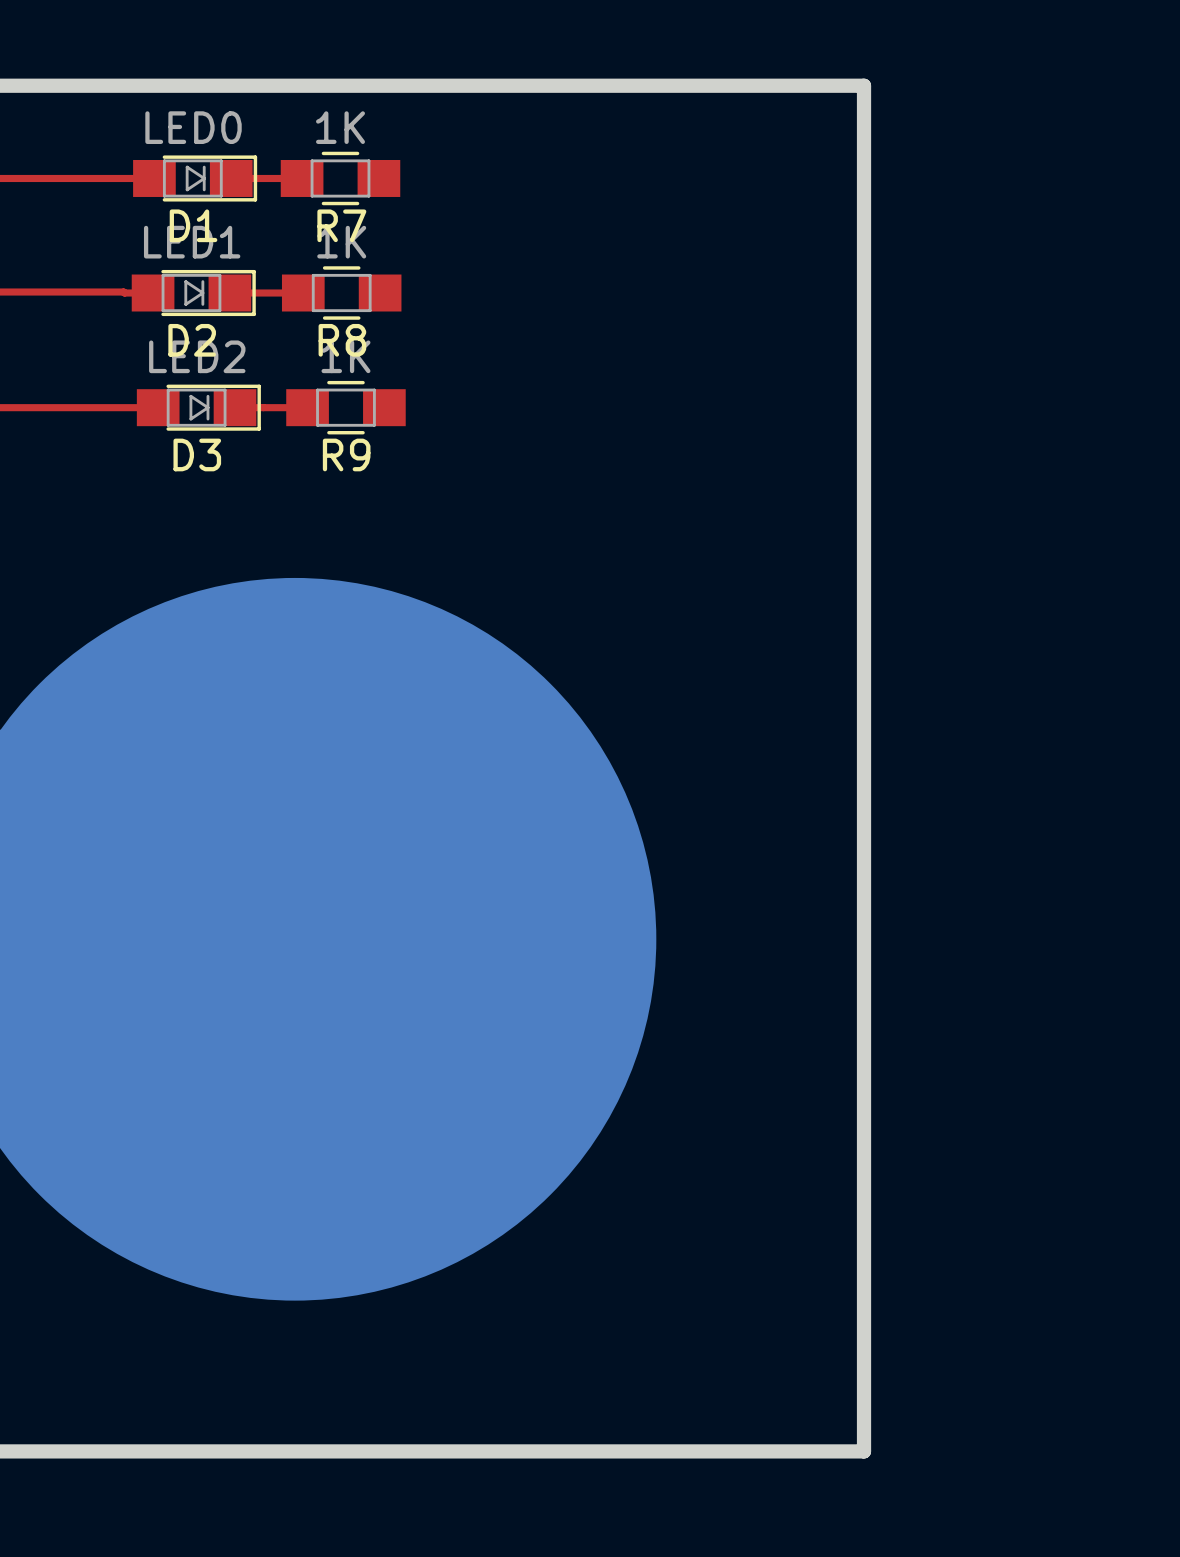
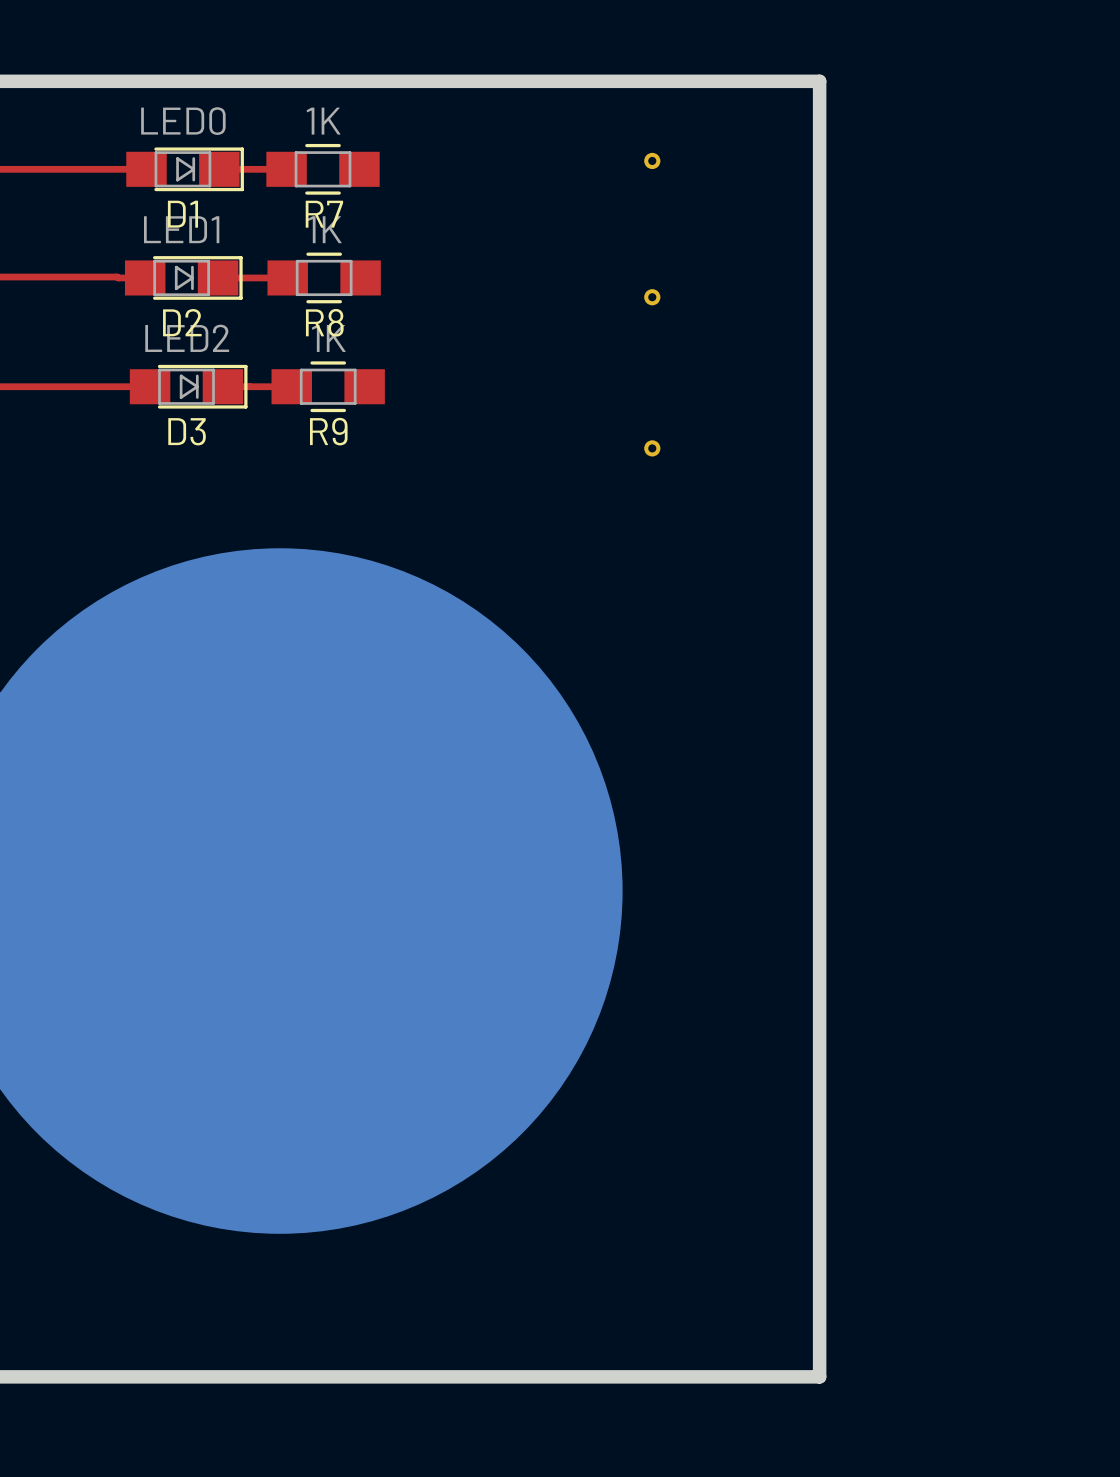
part: none -> (652, 160)
part: none -> (652, 297)
part: none -> (652, 448)

